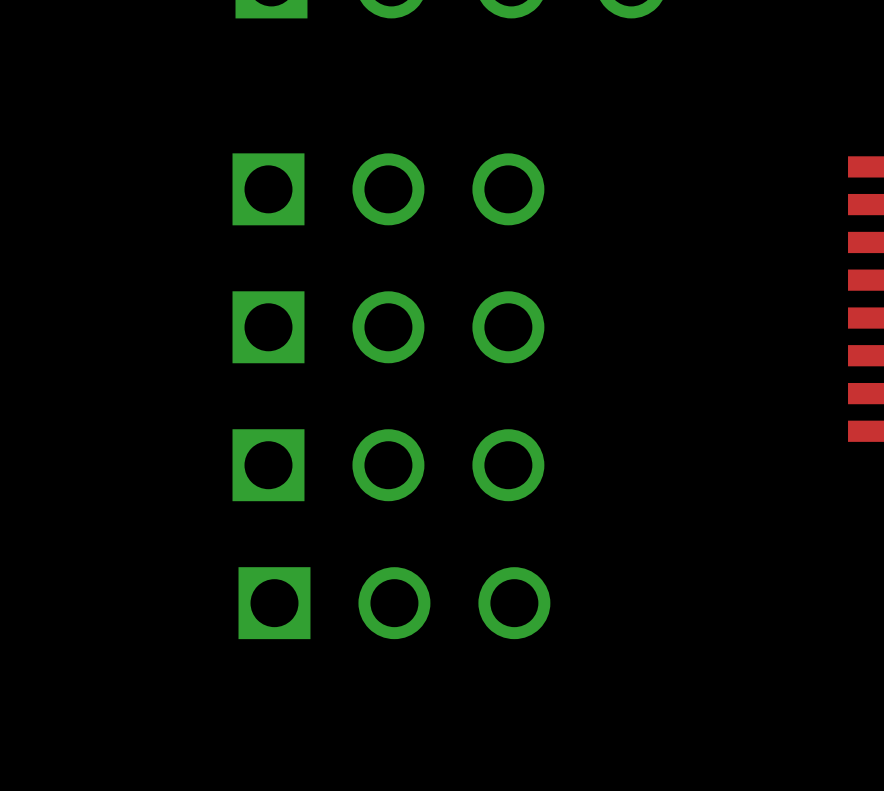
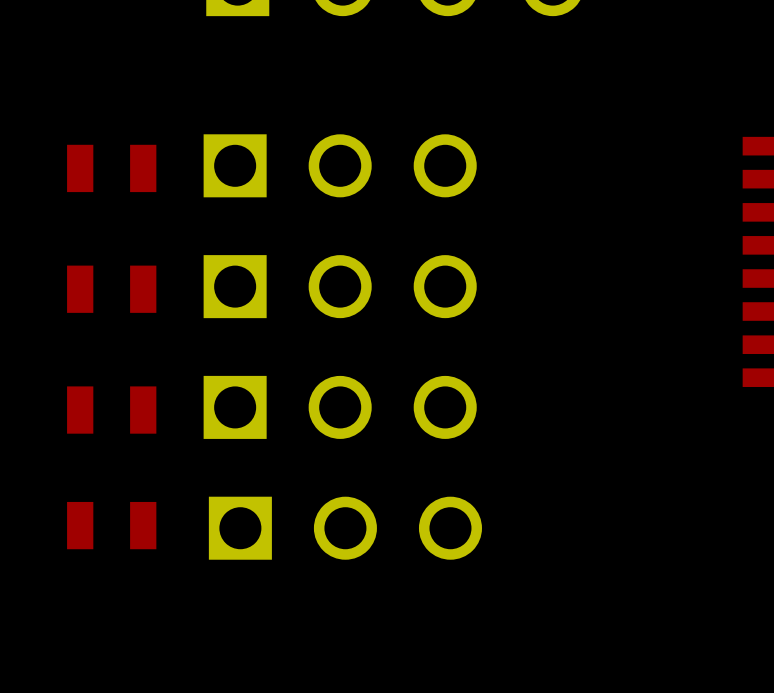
part: none -> (111, 168)
part: none -> (111, 289)
part: none -> (111, 410)
part: none -> (111, 525)

